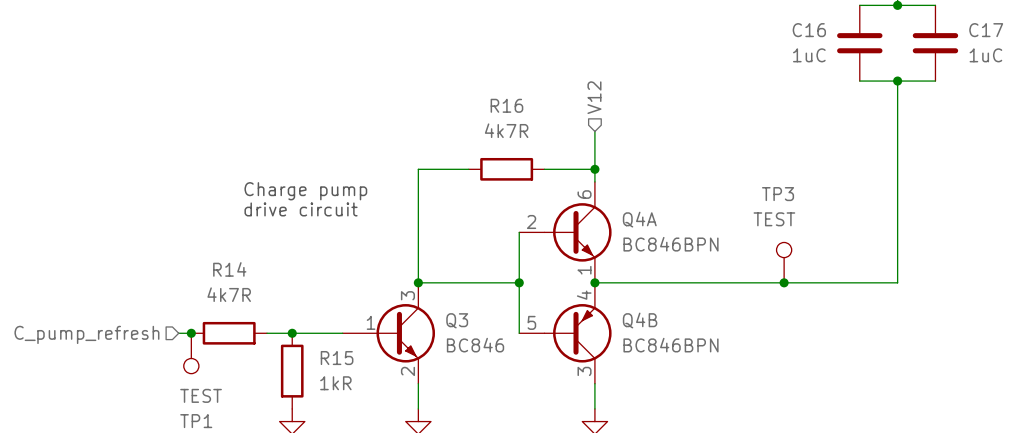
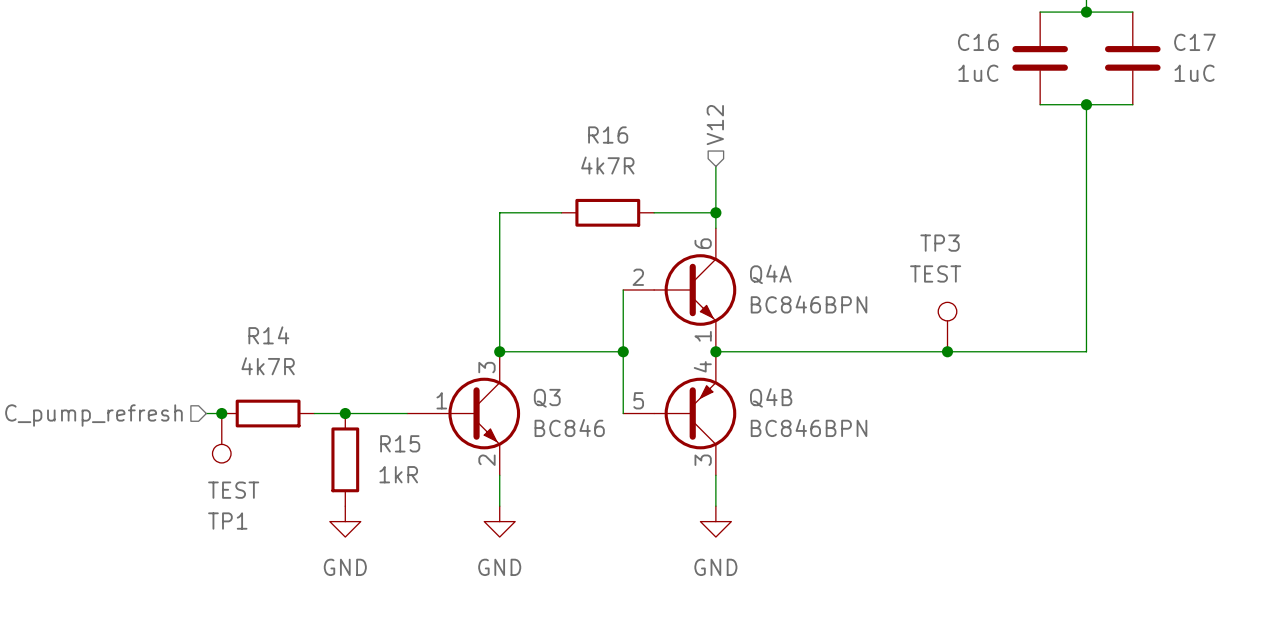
text: Charge pump (305, 191) -> none
text: drive circuit (301, 209) -> none

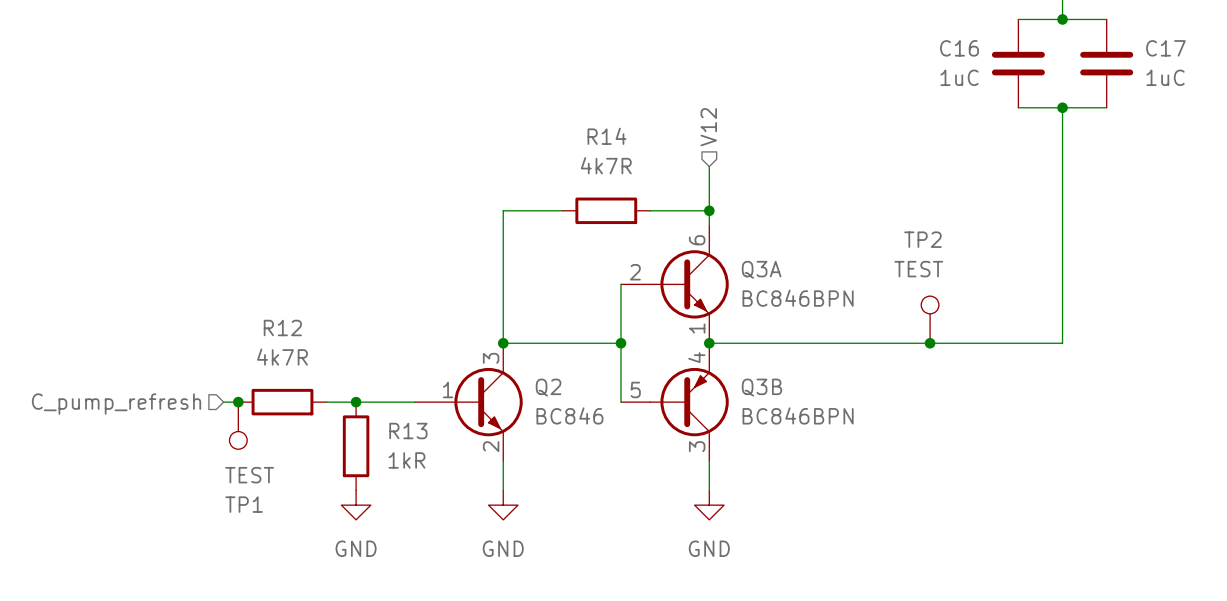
R16 name: R16 (608, 135) -> R14 (606, 136)
TP3 name: TP3 (940, 243) -> TP2 (922, 239)
Q4A name: Q4A (770, 274) -> Q3A (761, 269)
R14 name: R14 (268, 335) -> R12 (282, 327)
Q4B name: Q4B (771, 397) -> Q3B (761, 387)
Q3 name: Q3 (547, 398) -> Q2 (548, 387)
R15 name: R15 (400, 443) -> R13 (408, 431)

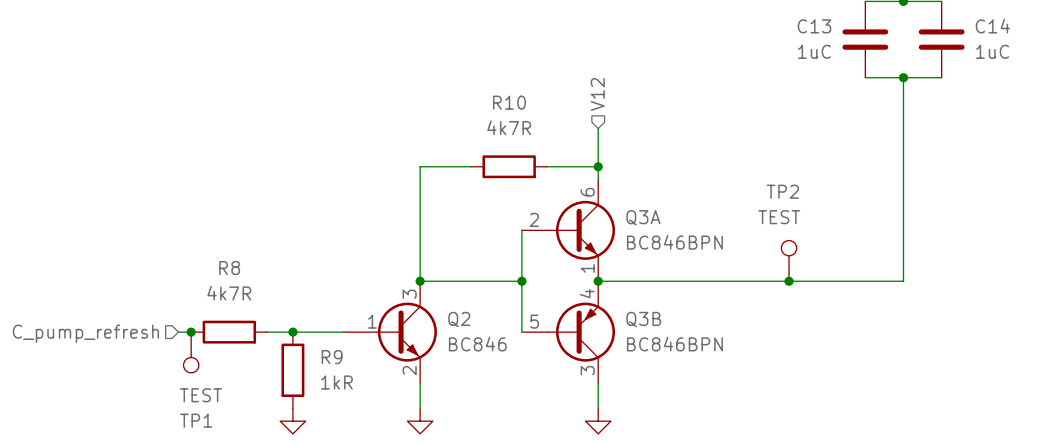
C16 name: C16 (959, 48) -> C13 (814, 26)
C17 name: C17 (1165, 48) -> C14 (992, 26)
R14 name: R14 (606, 136) -> R10 (509, 102)
R12 name: R12 (282, 327) -> R8 (229, 268)
R13 name: R13 (408, 431) -> R9 (332, 357)

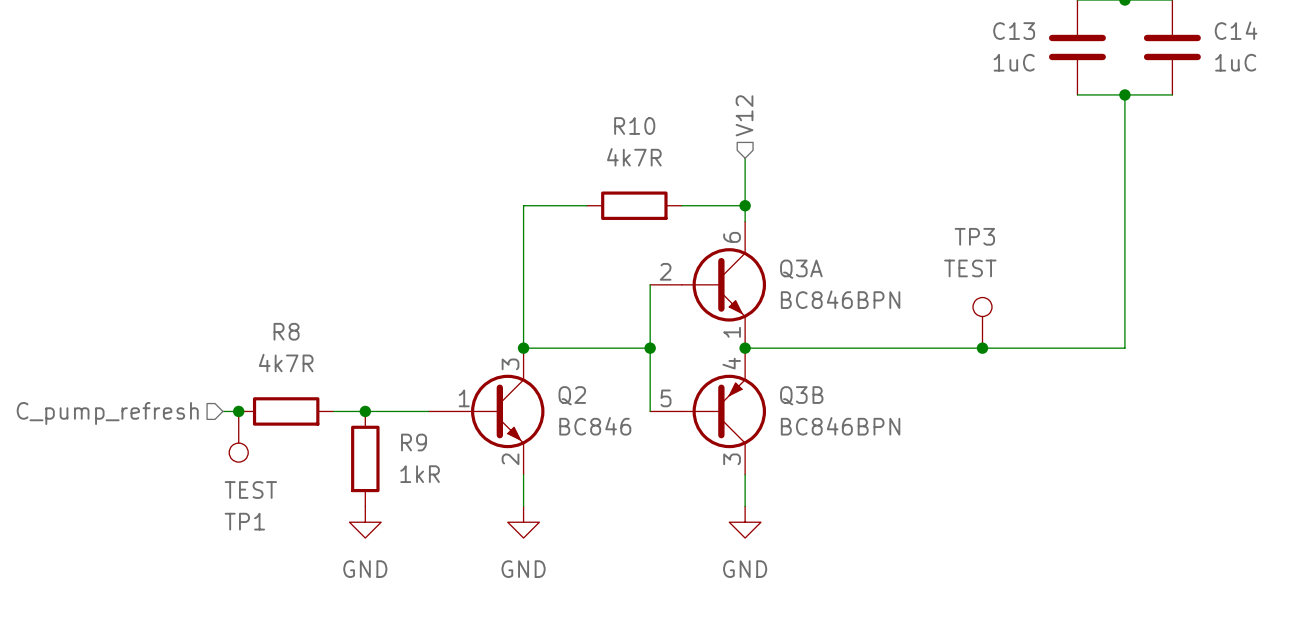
TP2 name: TP2 (782, 191) -> TP3 (974, 236)

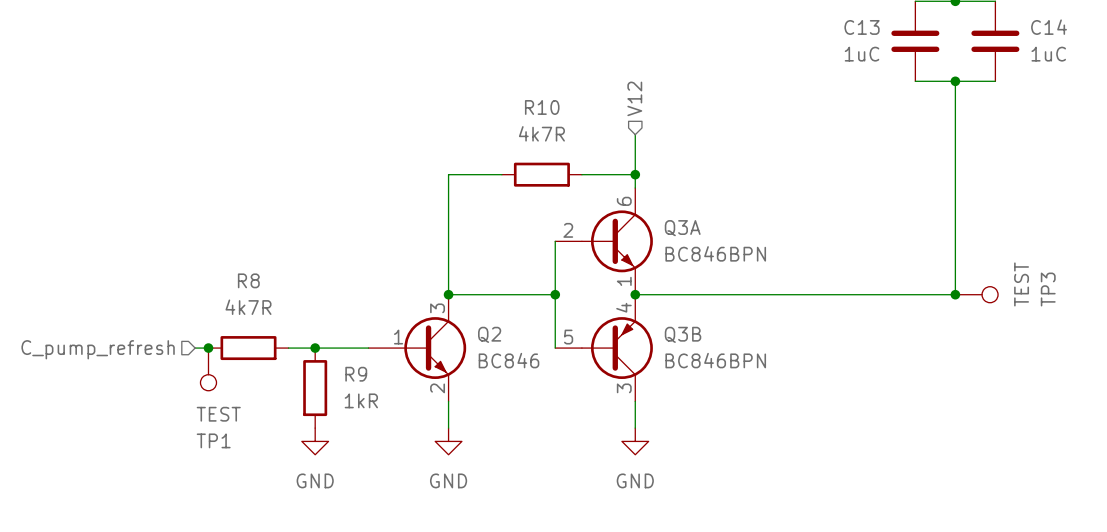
TP3 rotation: 0° (982, 307) -> 90° clockwise (990, 294)
TP3 position: (982, 322) -> (976, 294)
junction: (982, 348) -> none
junction: none -> (955, 294)

